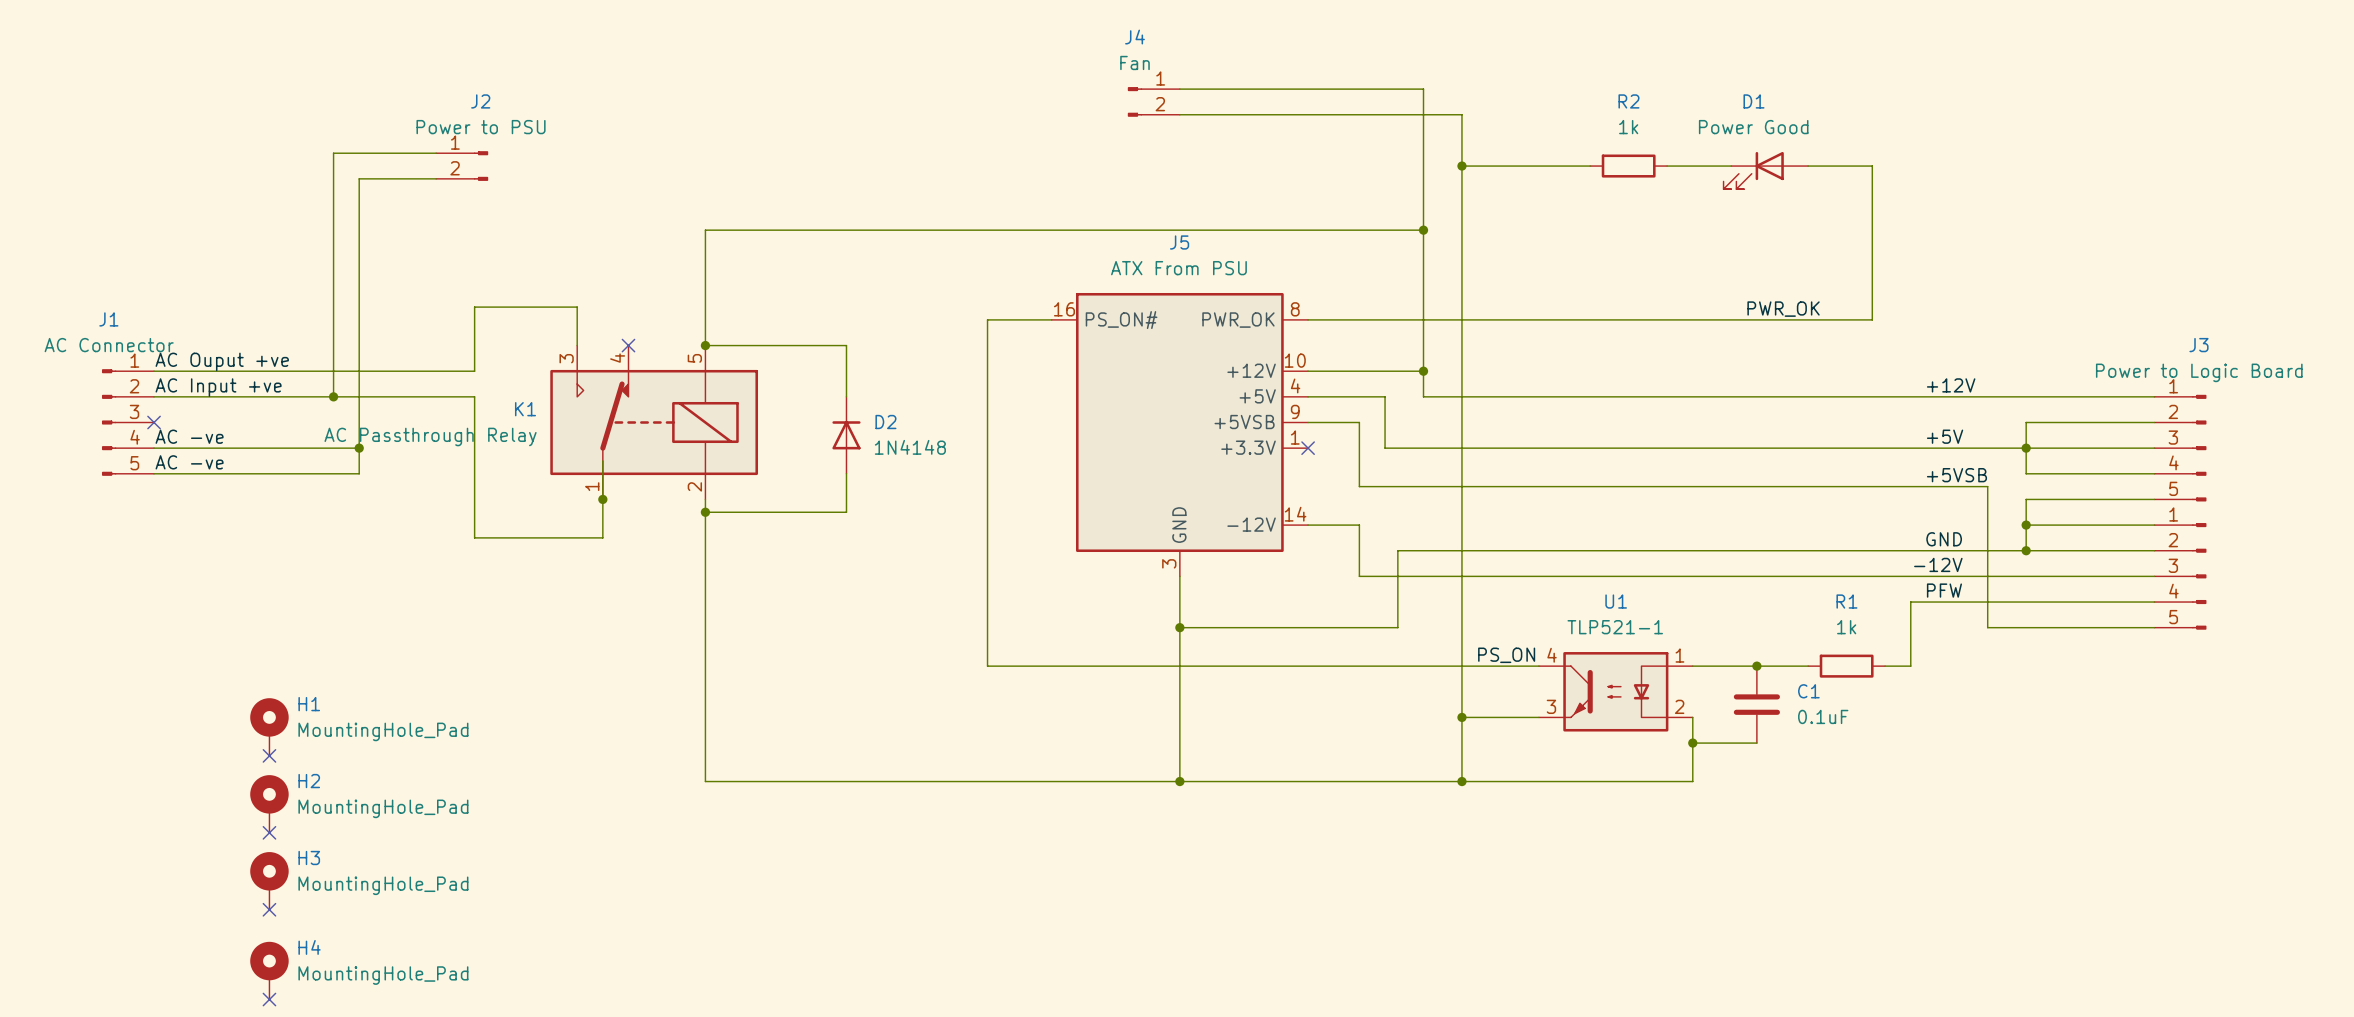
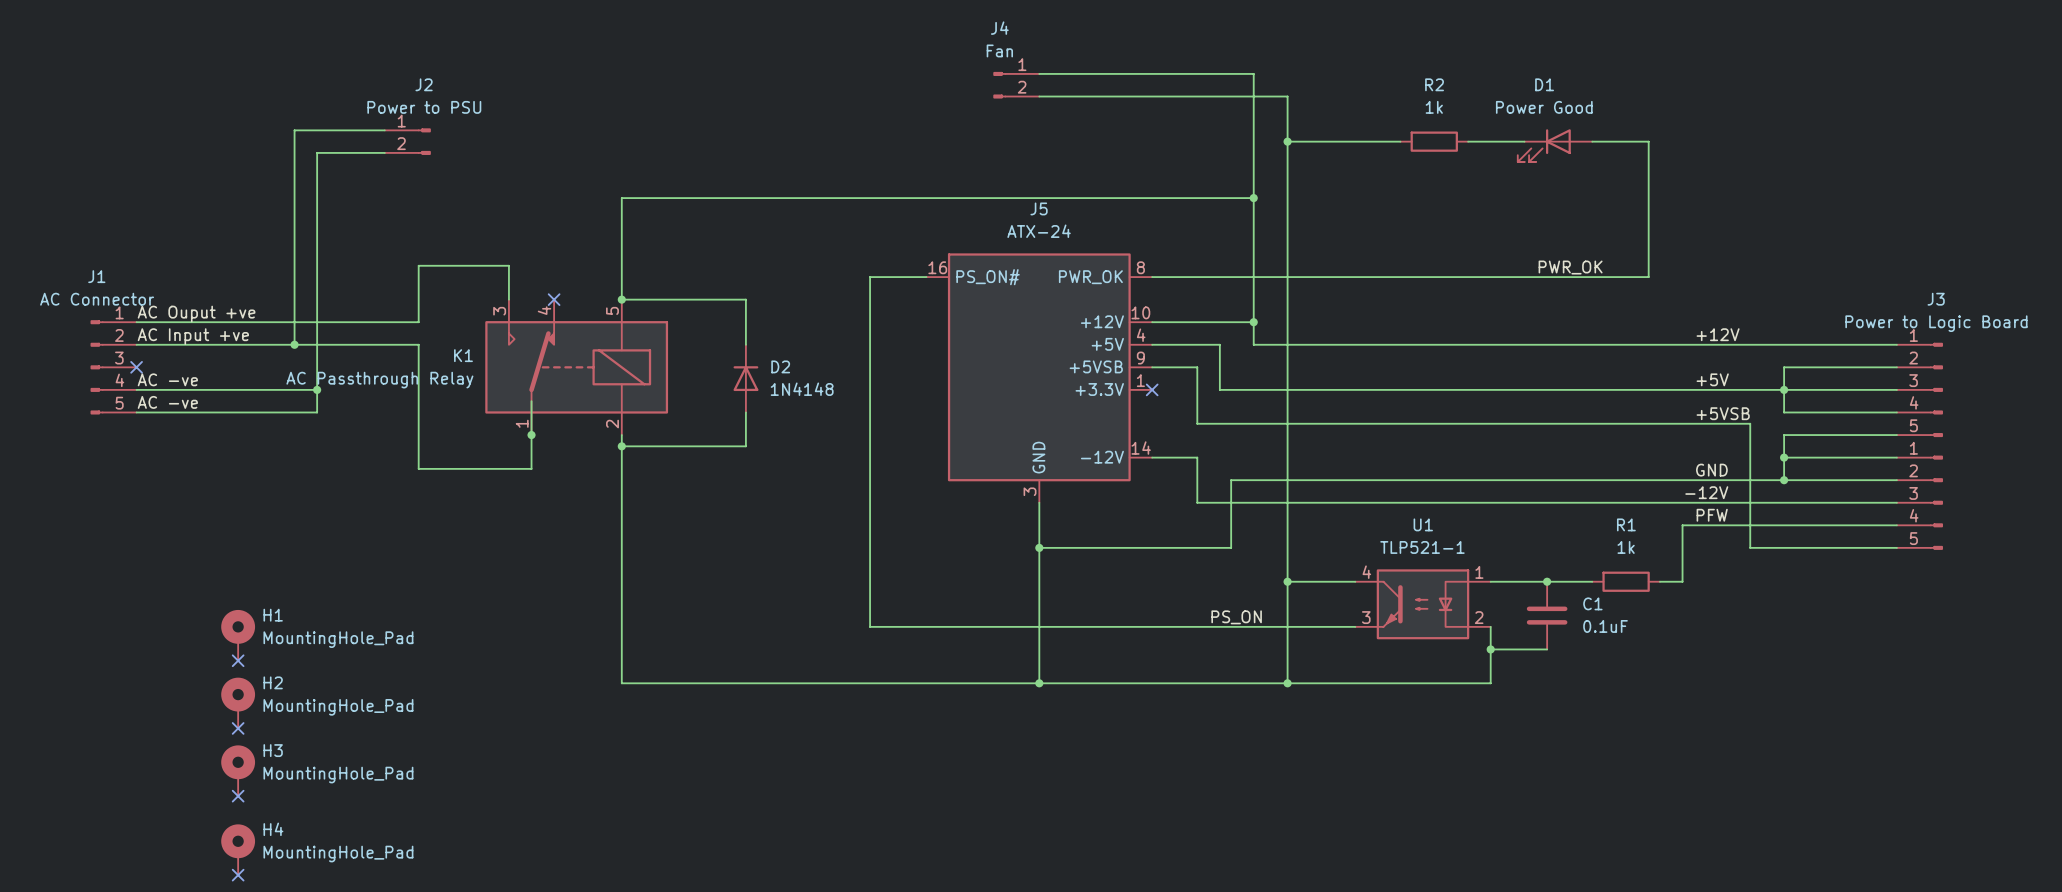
J5 value: ATX From PSU (1178, 268) -> ATX-24 (1039, 231)
label position: PS_ON (1506, 655) -> PS_ON (1236, 617)
wire: (987, 666) (1461, 666) -> (870, 581) (870, 626) (1287, 626)
junction position: (1461, 717) -> (1287, 581)

